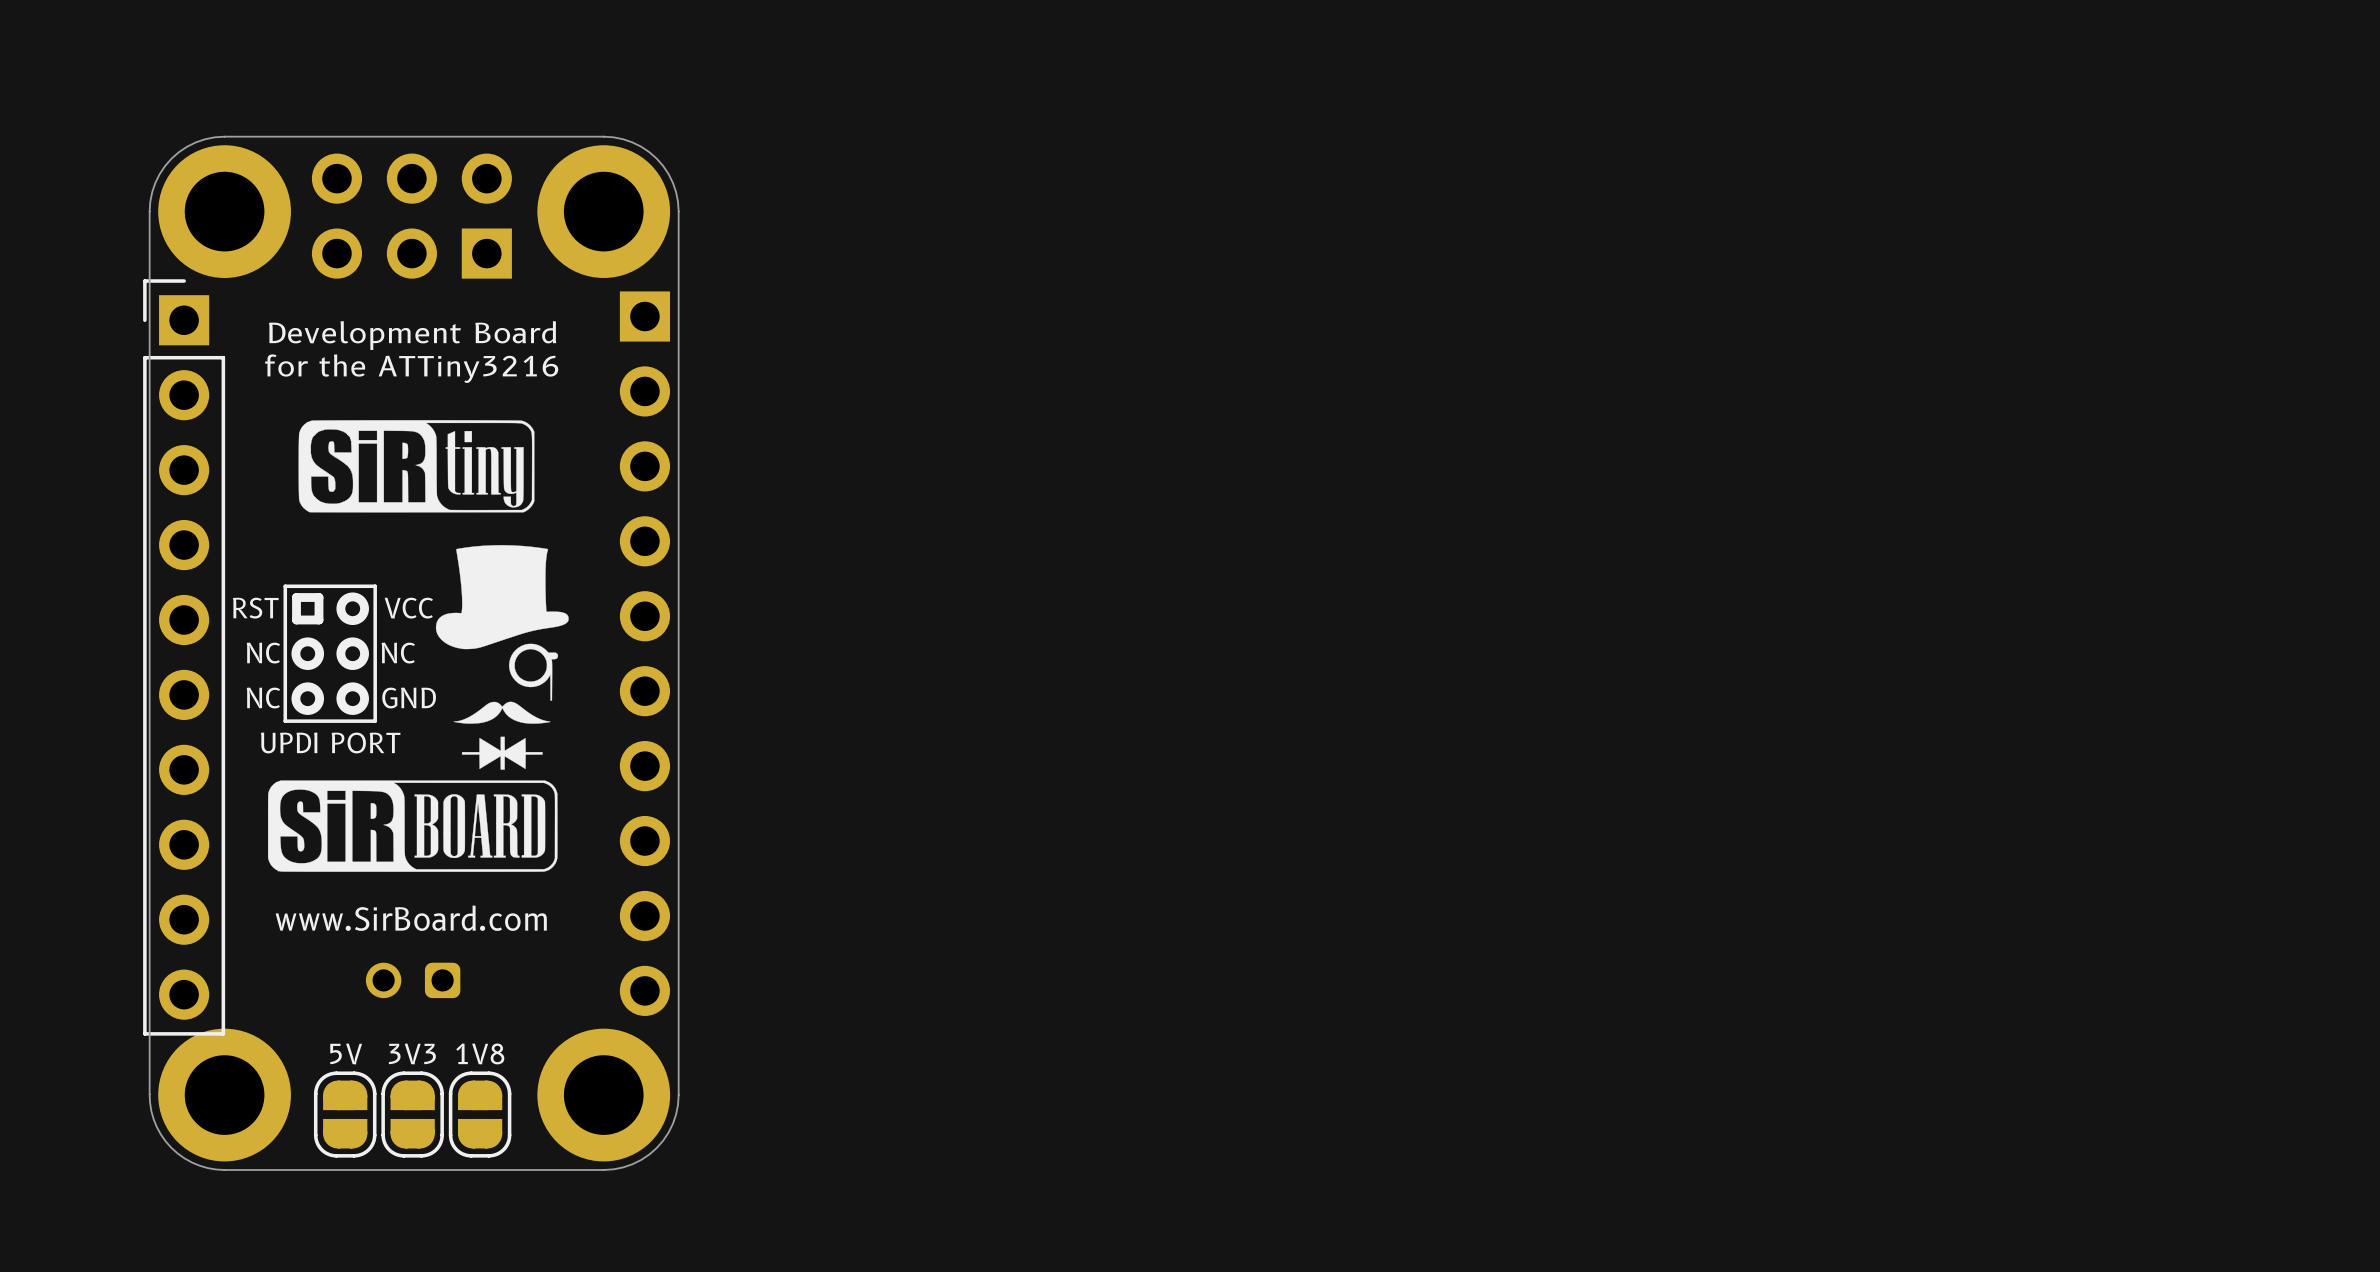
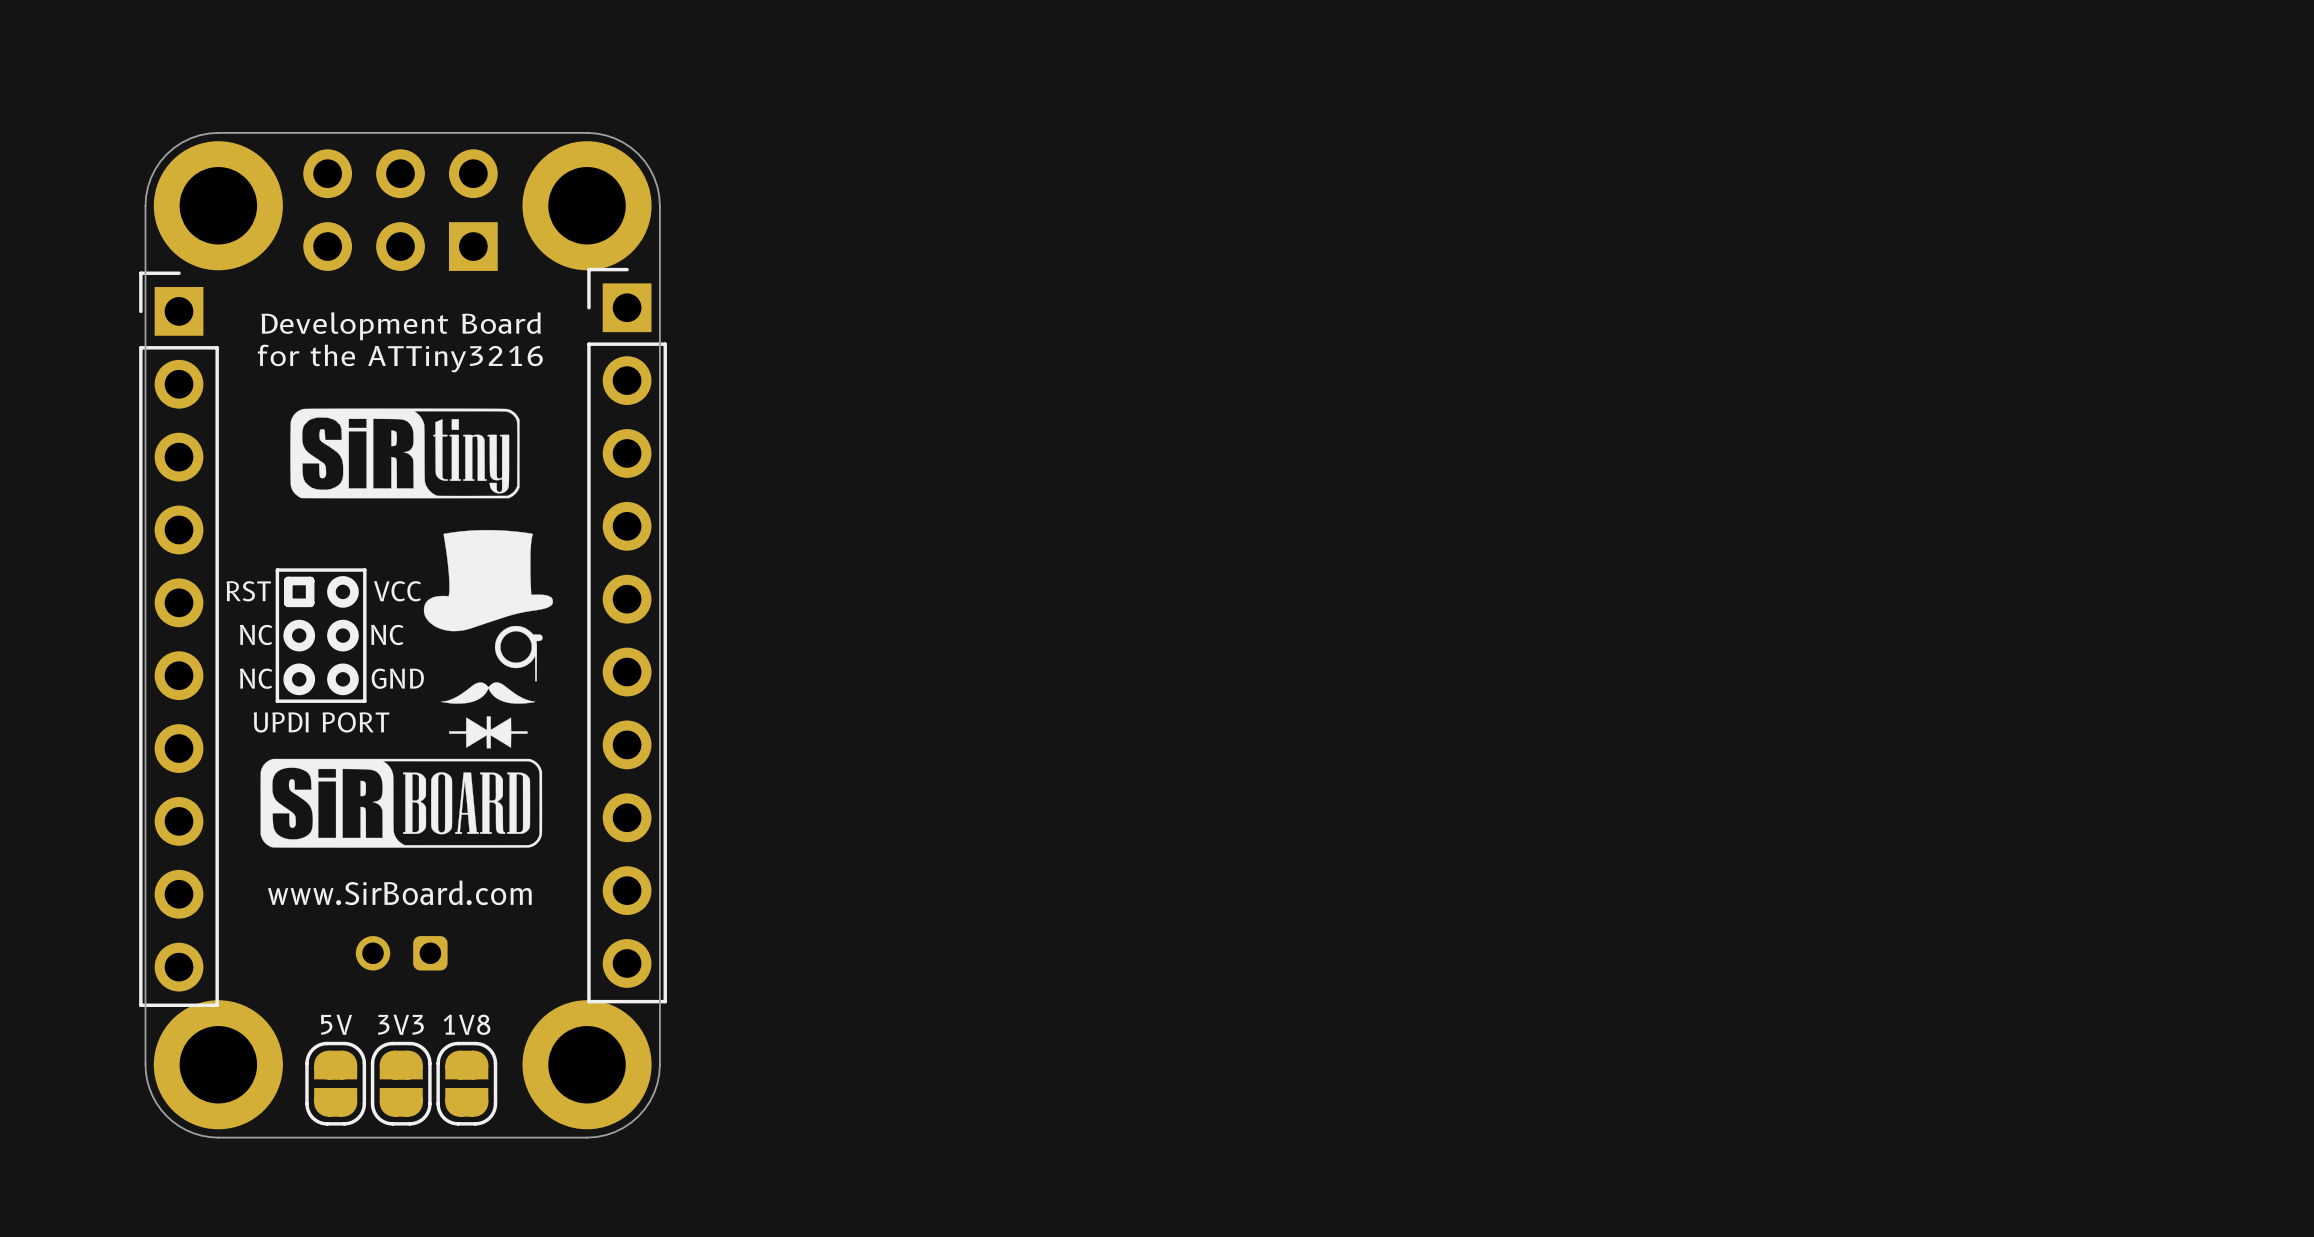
part footprint: [619, 291, 671, 1016] -> [587, 267, 667, 1004]

